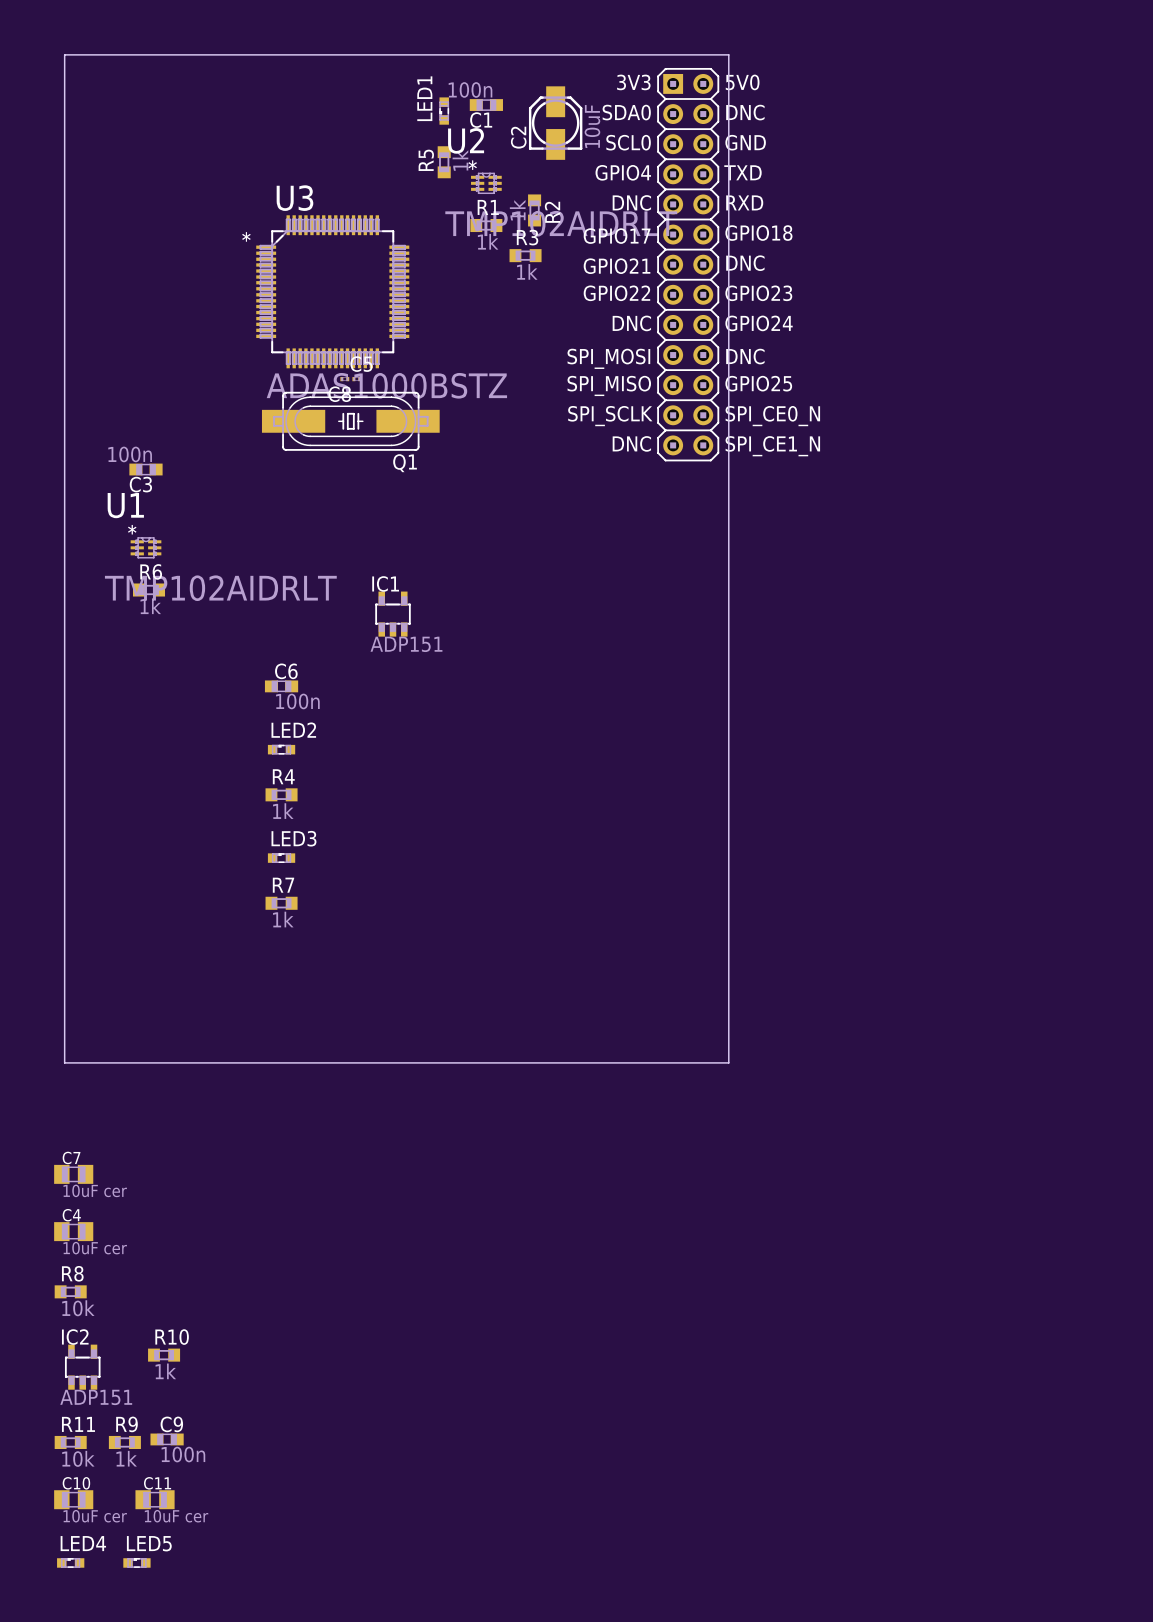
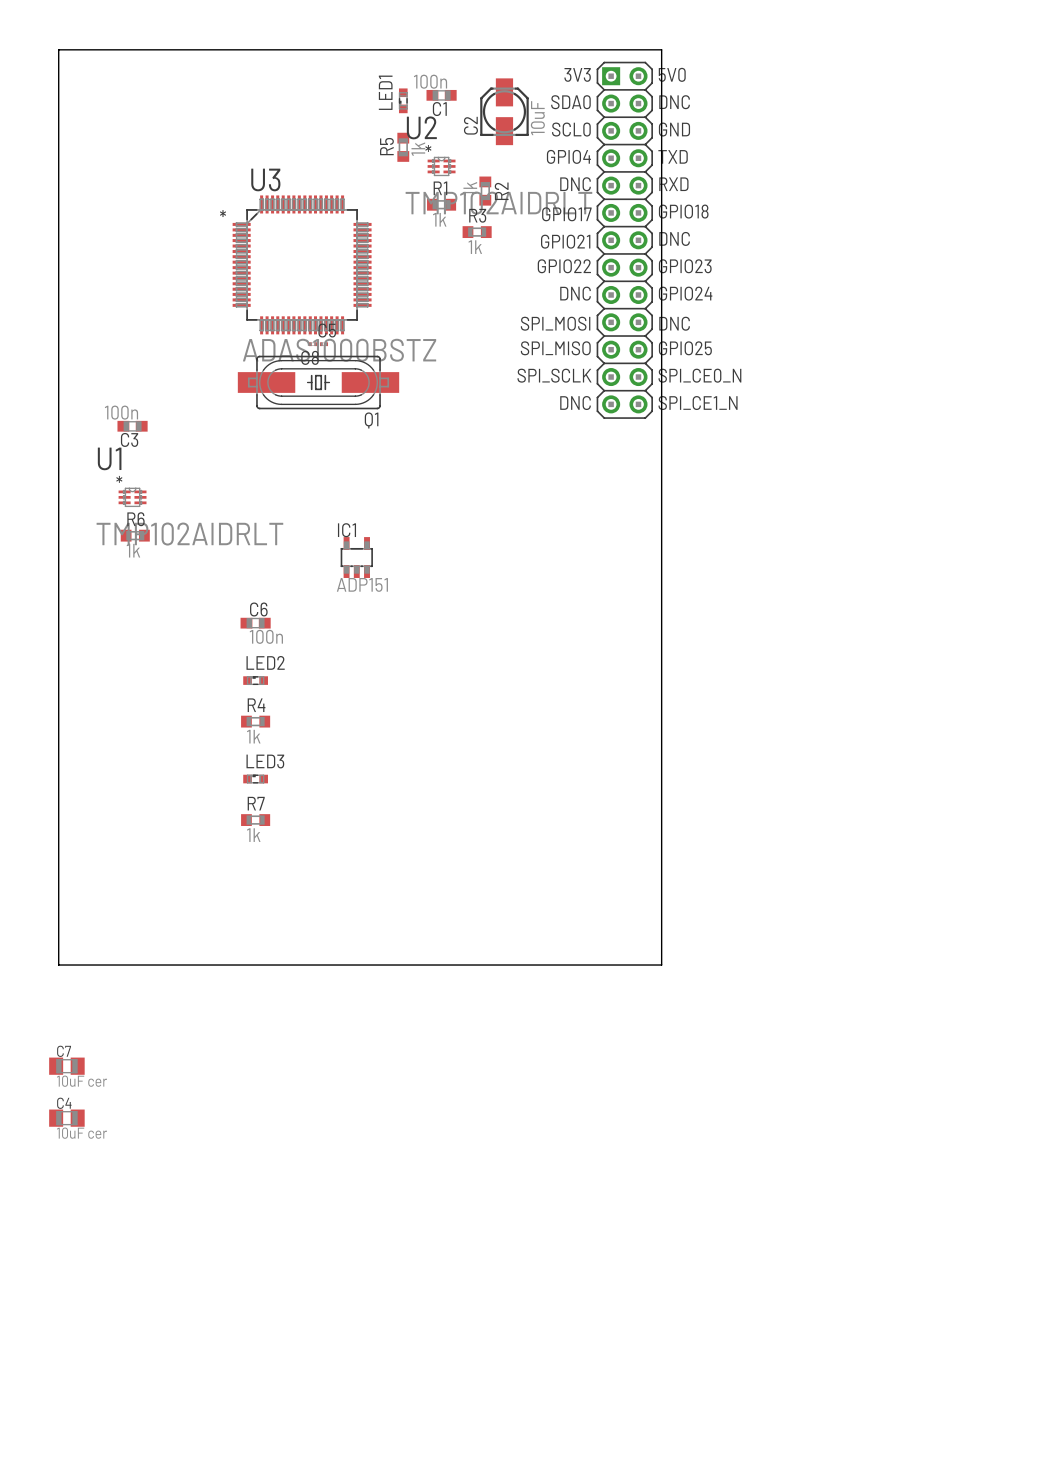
R8: 10k (70, 1291) -> none
R10: 1k (164, 1355) -> none
IC2: ADP151 (82, 1367) -> none
C9: 100n (167, 1439) -> none
R11: 10k (70, 1442) -> none
R9: 1k (124, 1442) -> none
C10: 10uF cer (73, 1499) -> none
C11: 10uF cer (155, 1499) -> none
LED4: (70, 1562) -> none
LED5: (136, 1562) -> none

